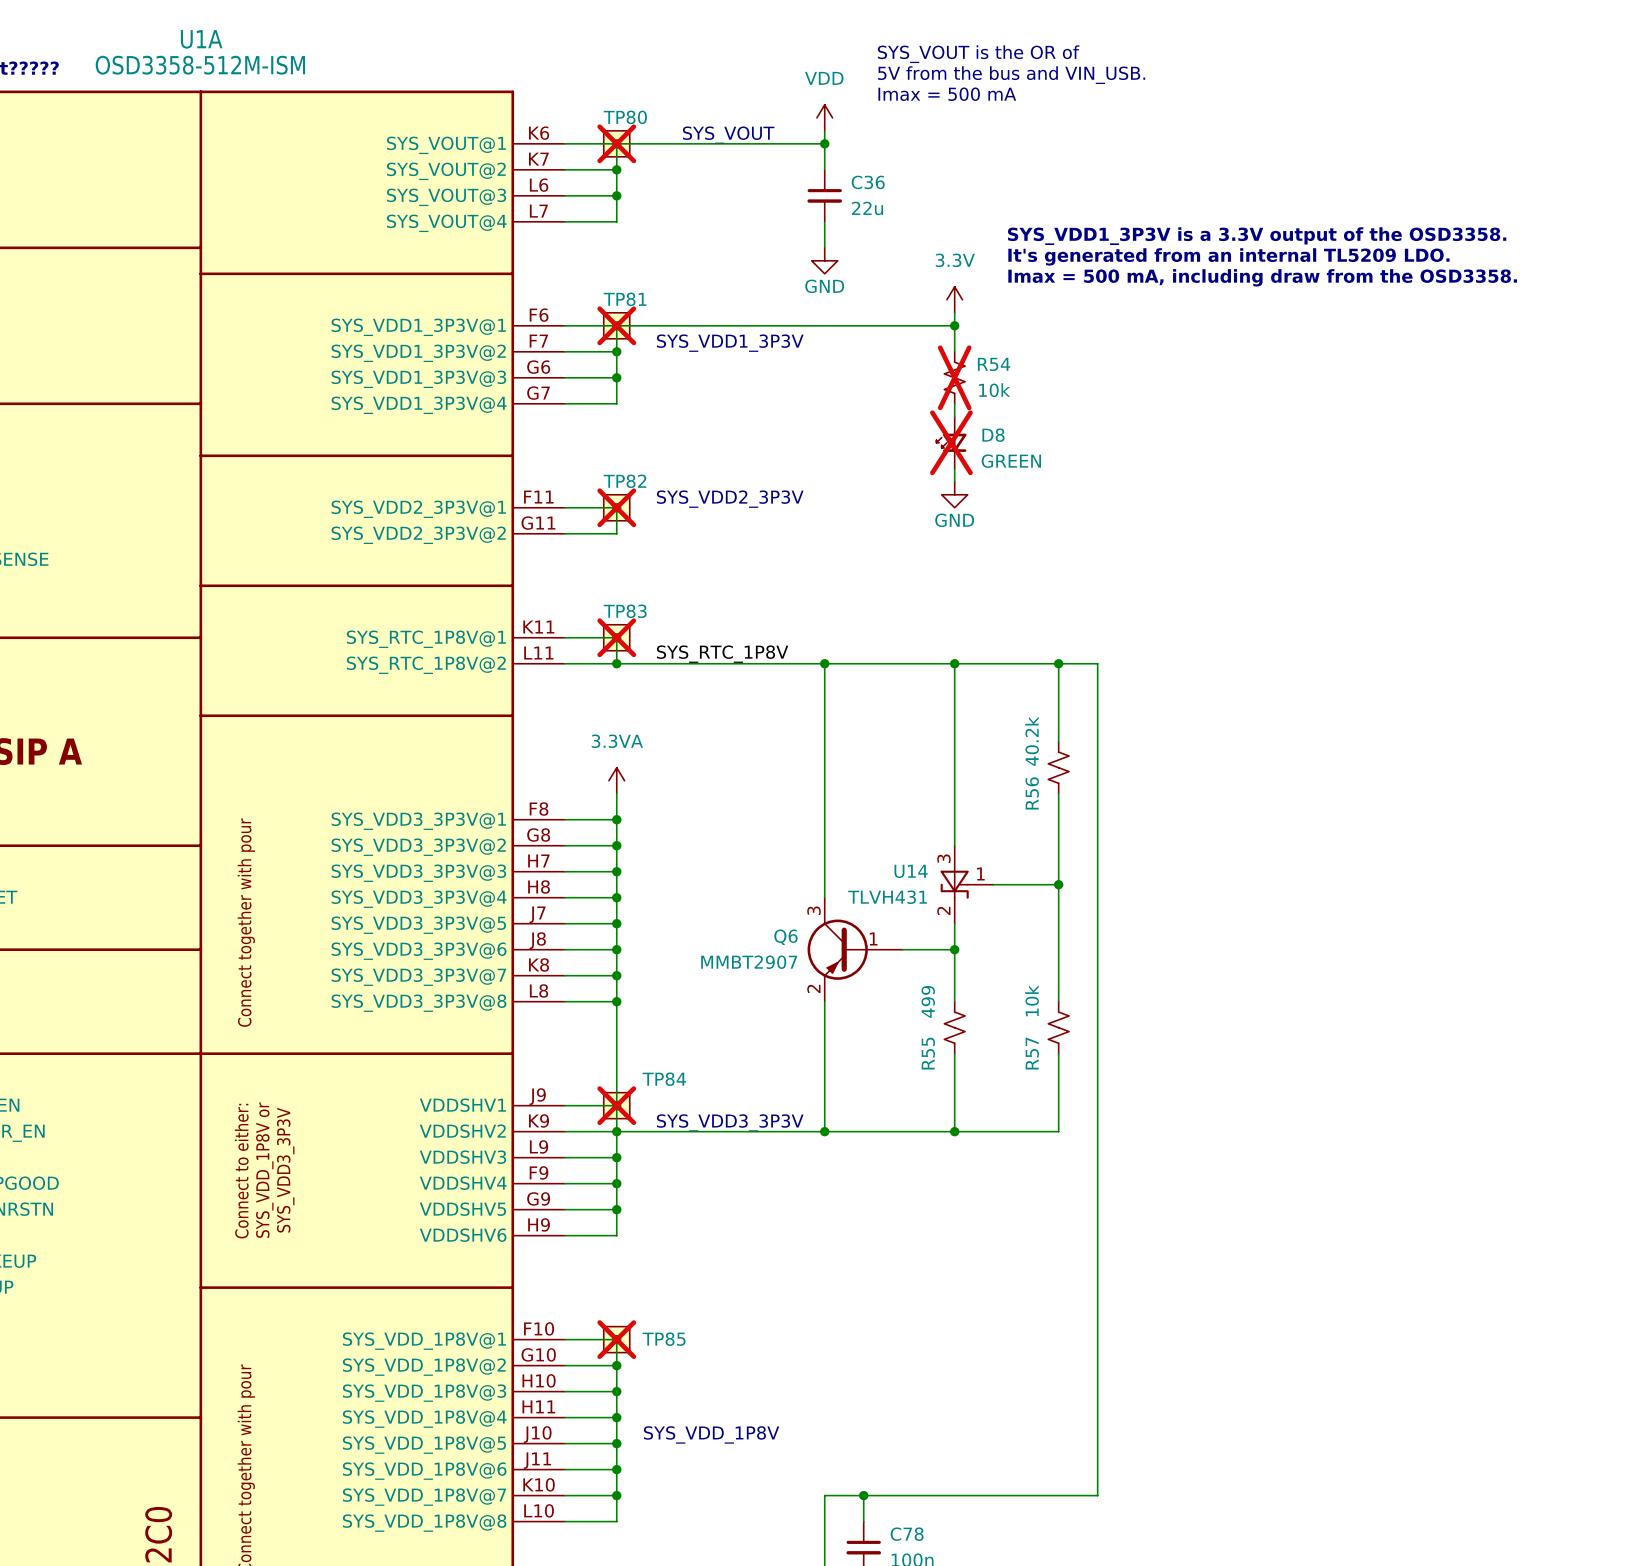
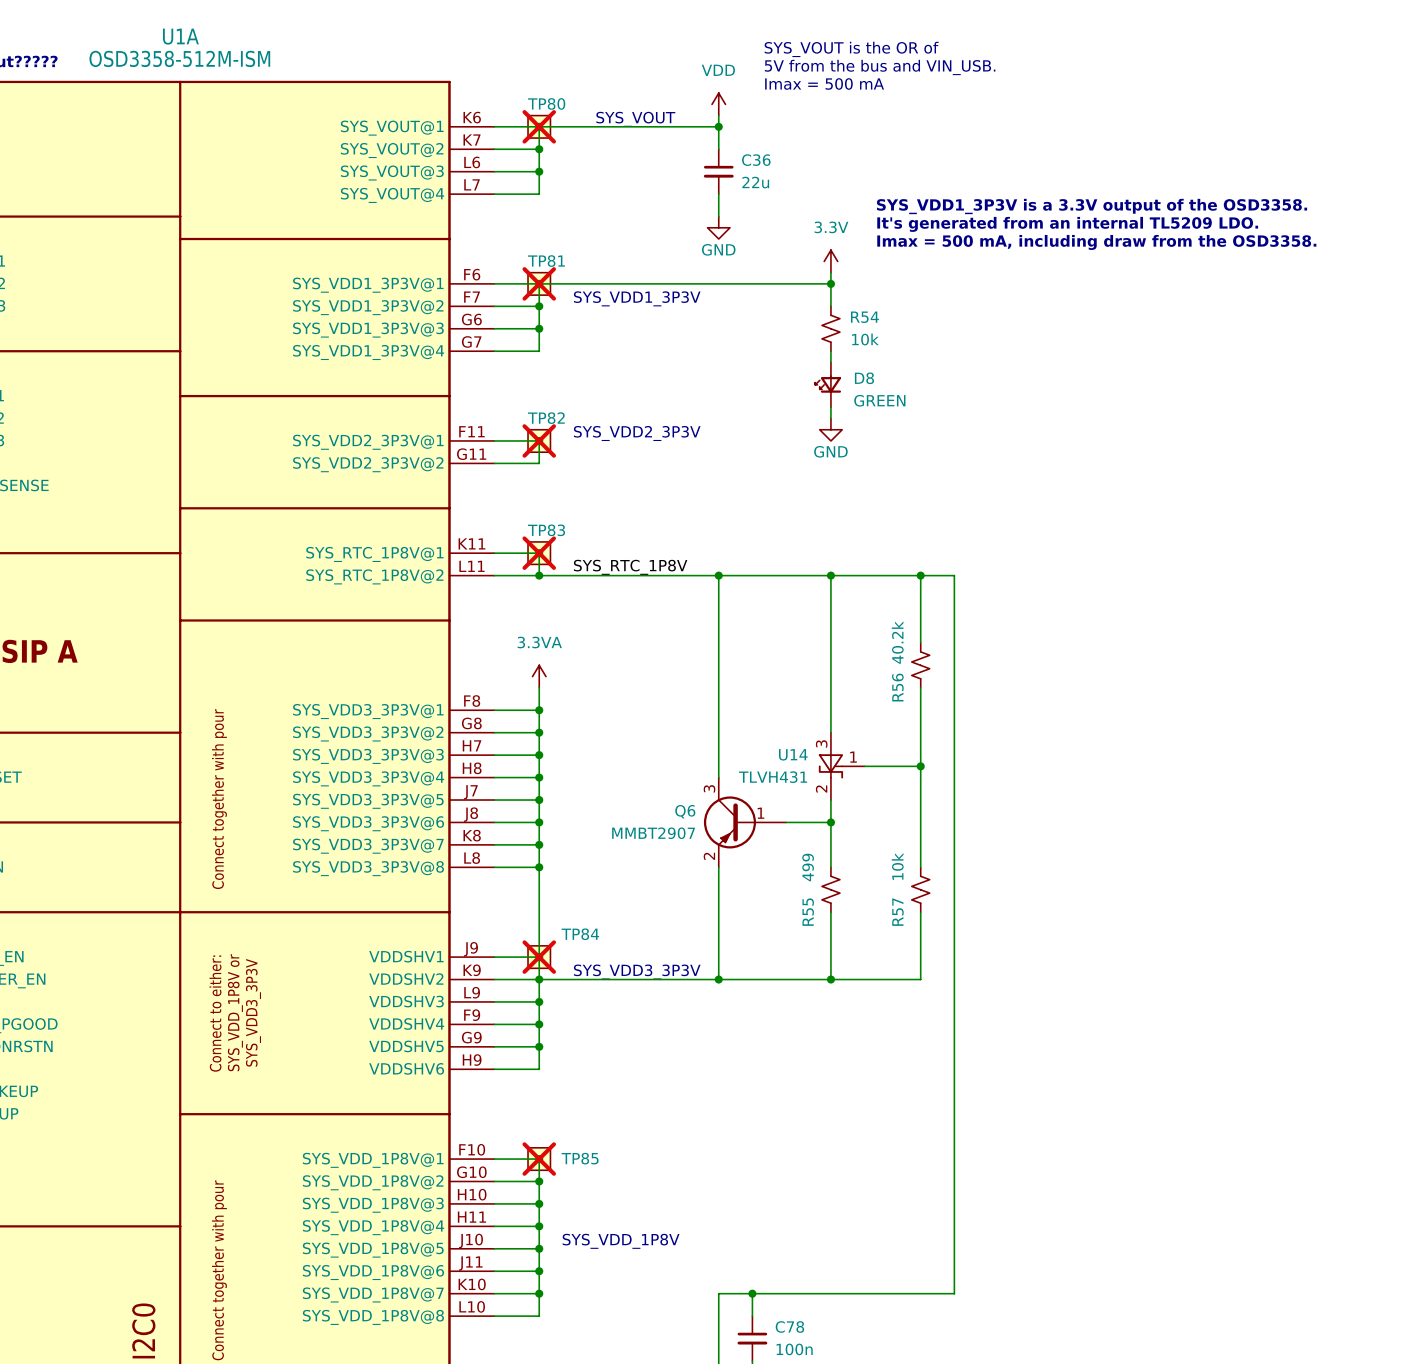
R54 do-not-place cross: (954, 377) -> none
D8 do-not-place cross: (951, 442) -> none

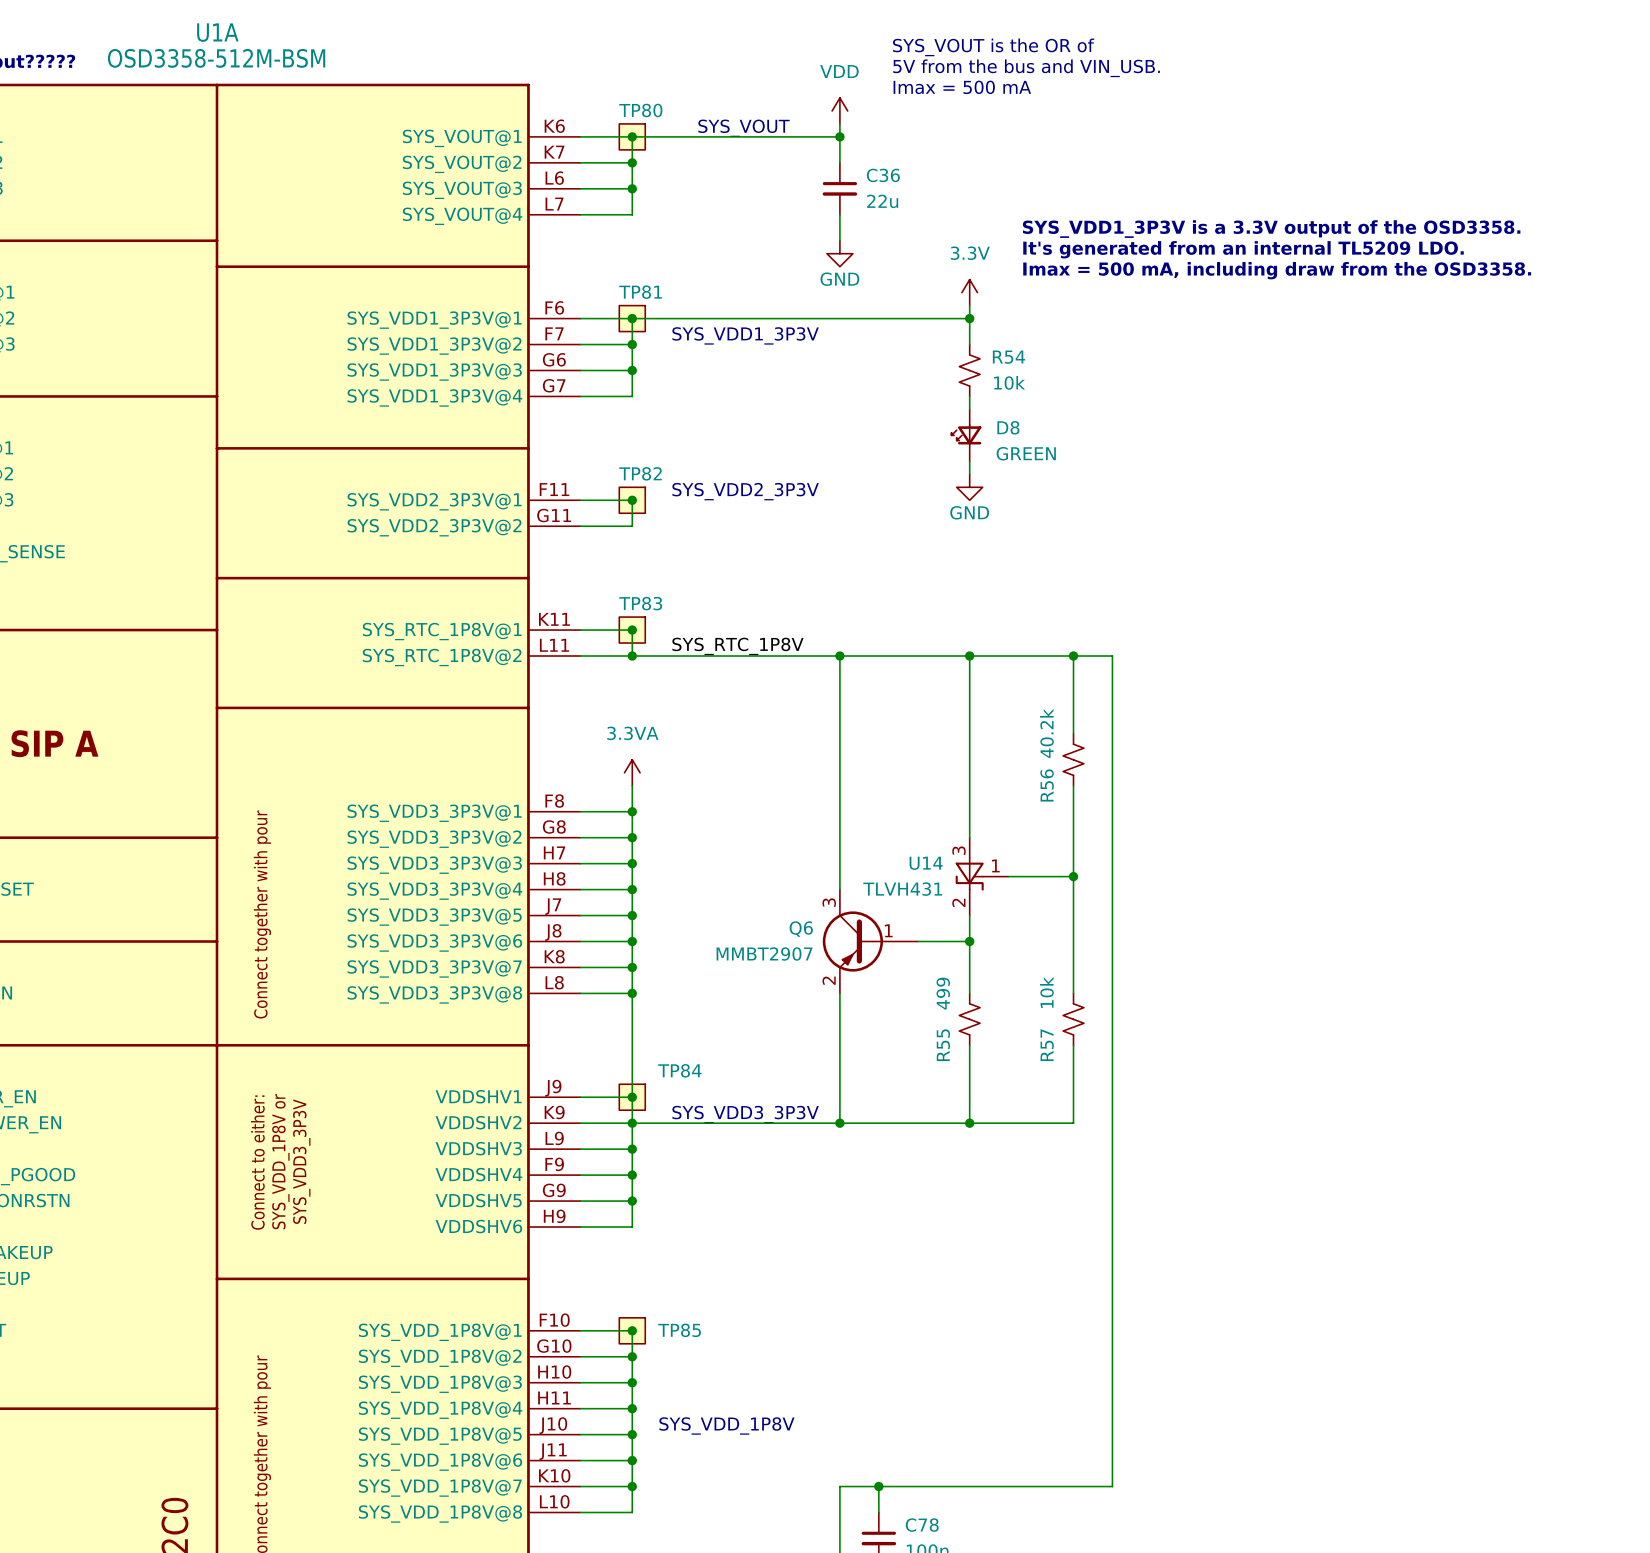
U1A value: OSD3358-512M-ISM (179, 58) -> OSD3358-512M-BSM (216, 58)
TP80 do-not-place cross: (539, 126) -> none
TP81 do-not-place cross: (539, 283) -> none
TP82 do-not-place cross: (539, 440) -> none
TP83 do-not-place cross: (539, 553) -> none
TP84 do-not-place cross: (539, 957) -> none
TP85 do-not-place cross: (539, 1159) -> none

